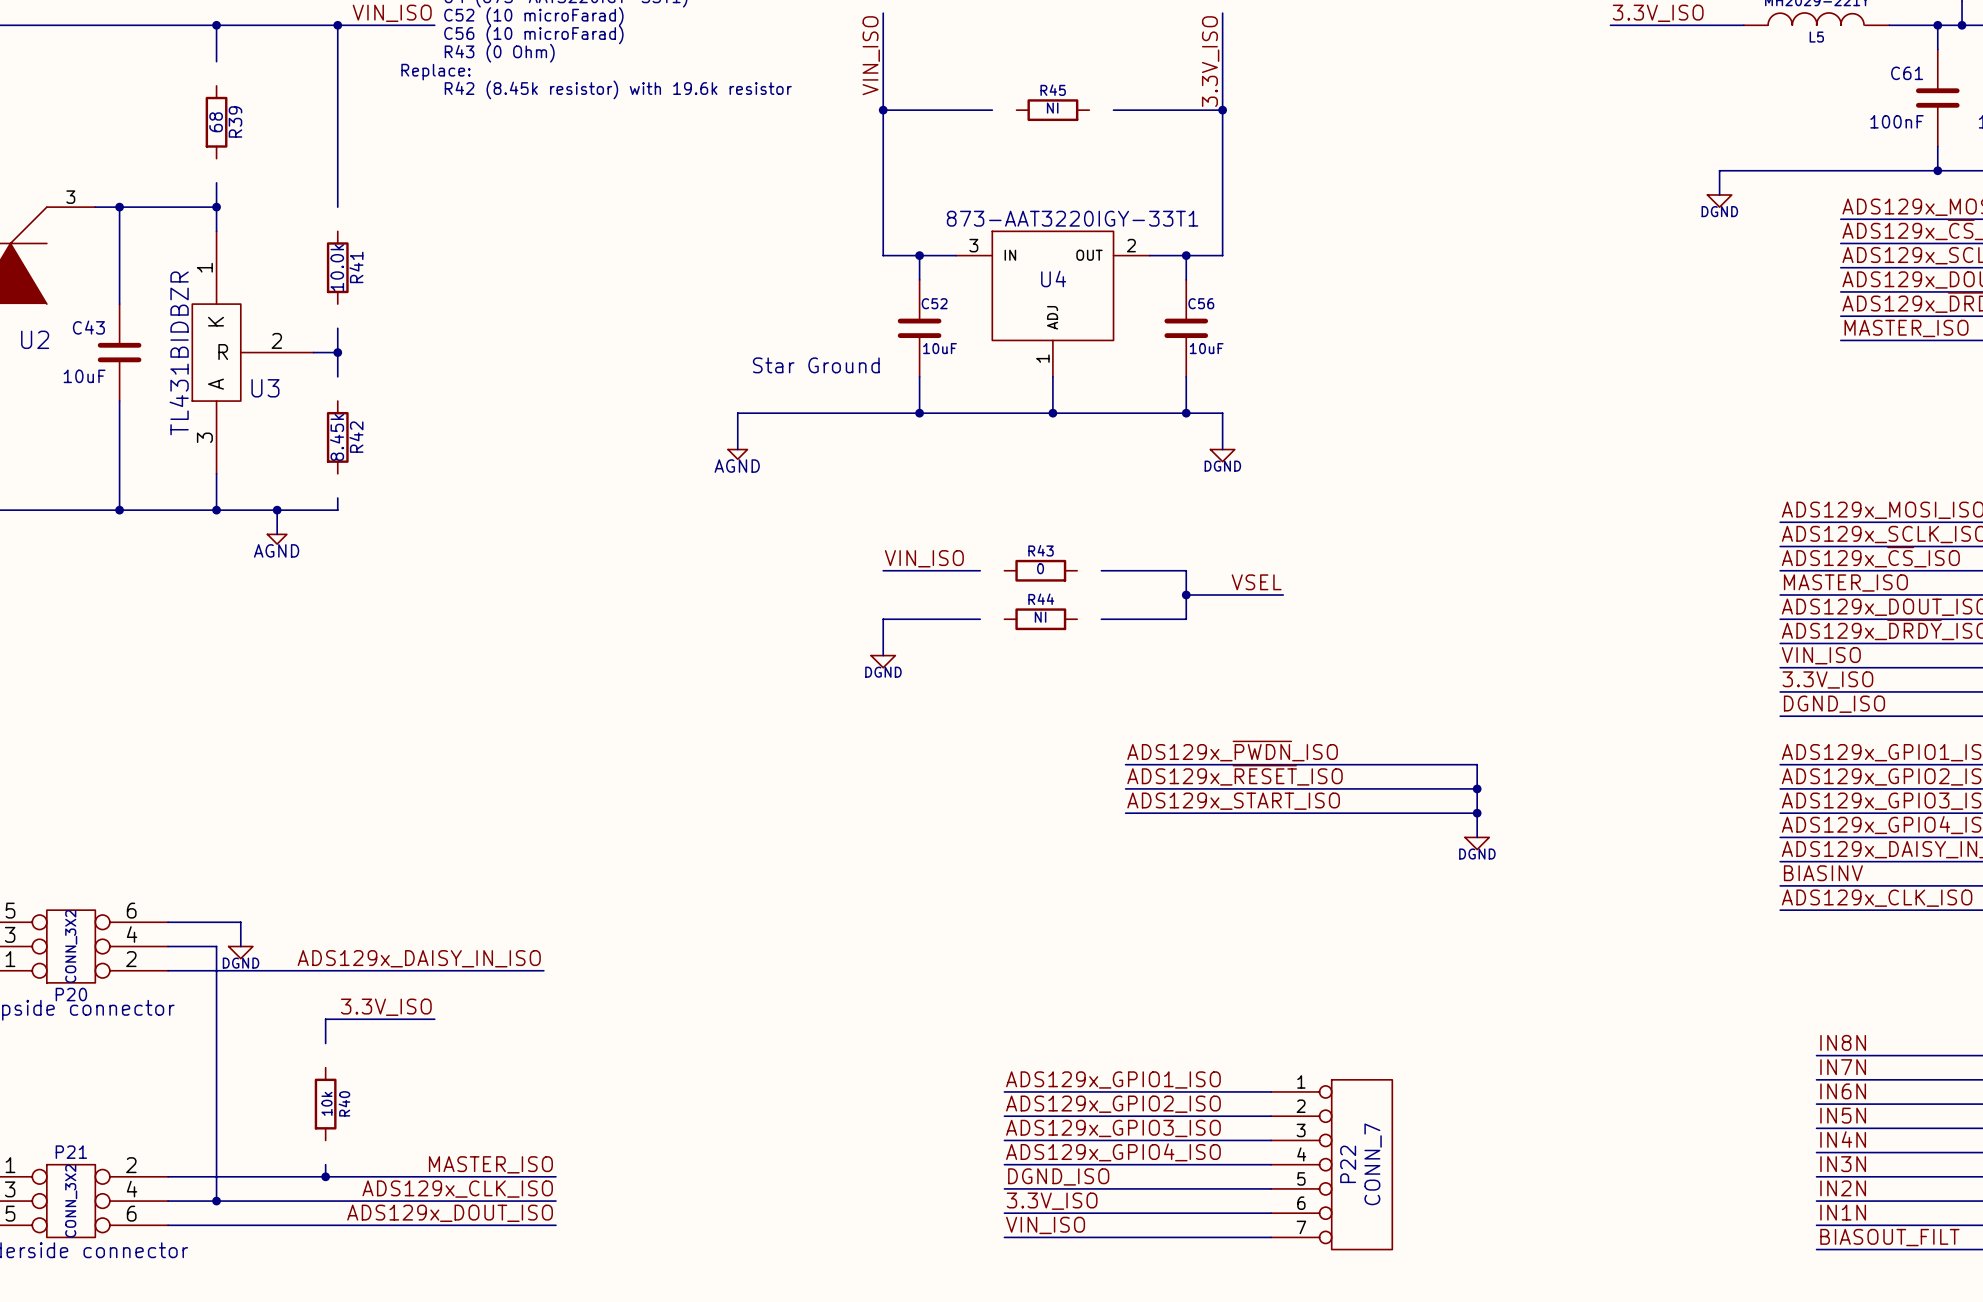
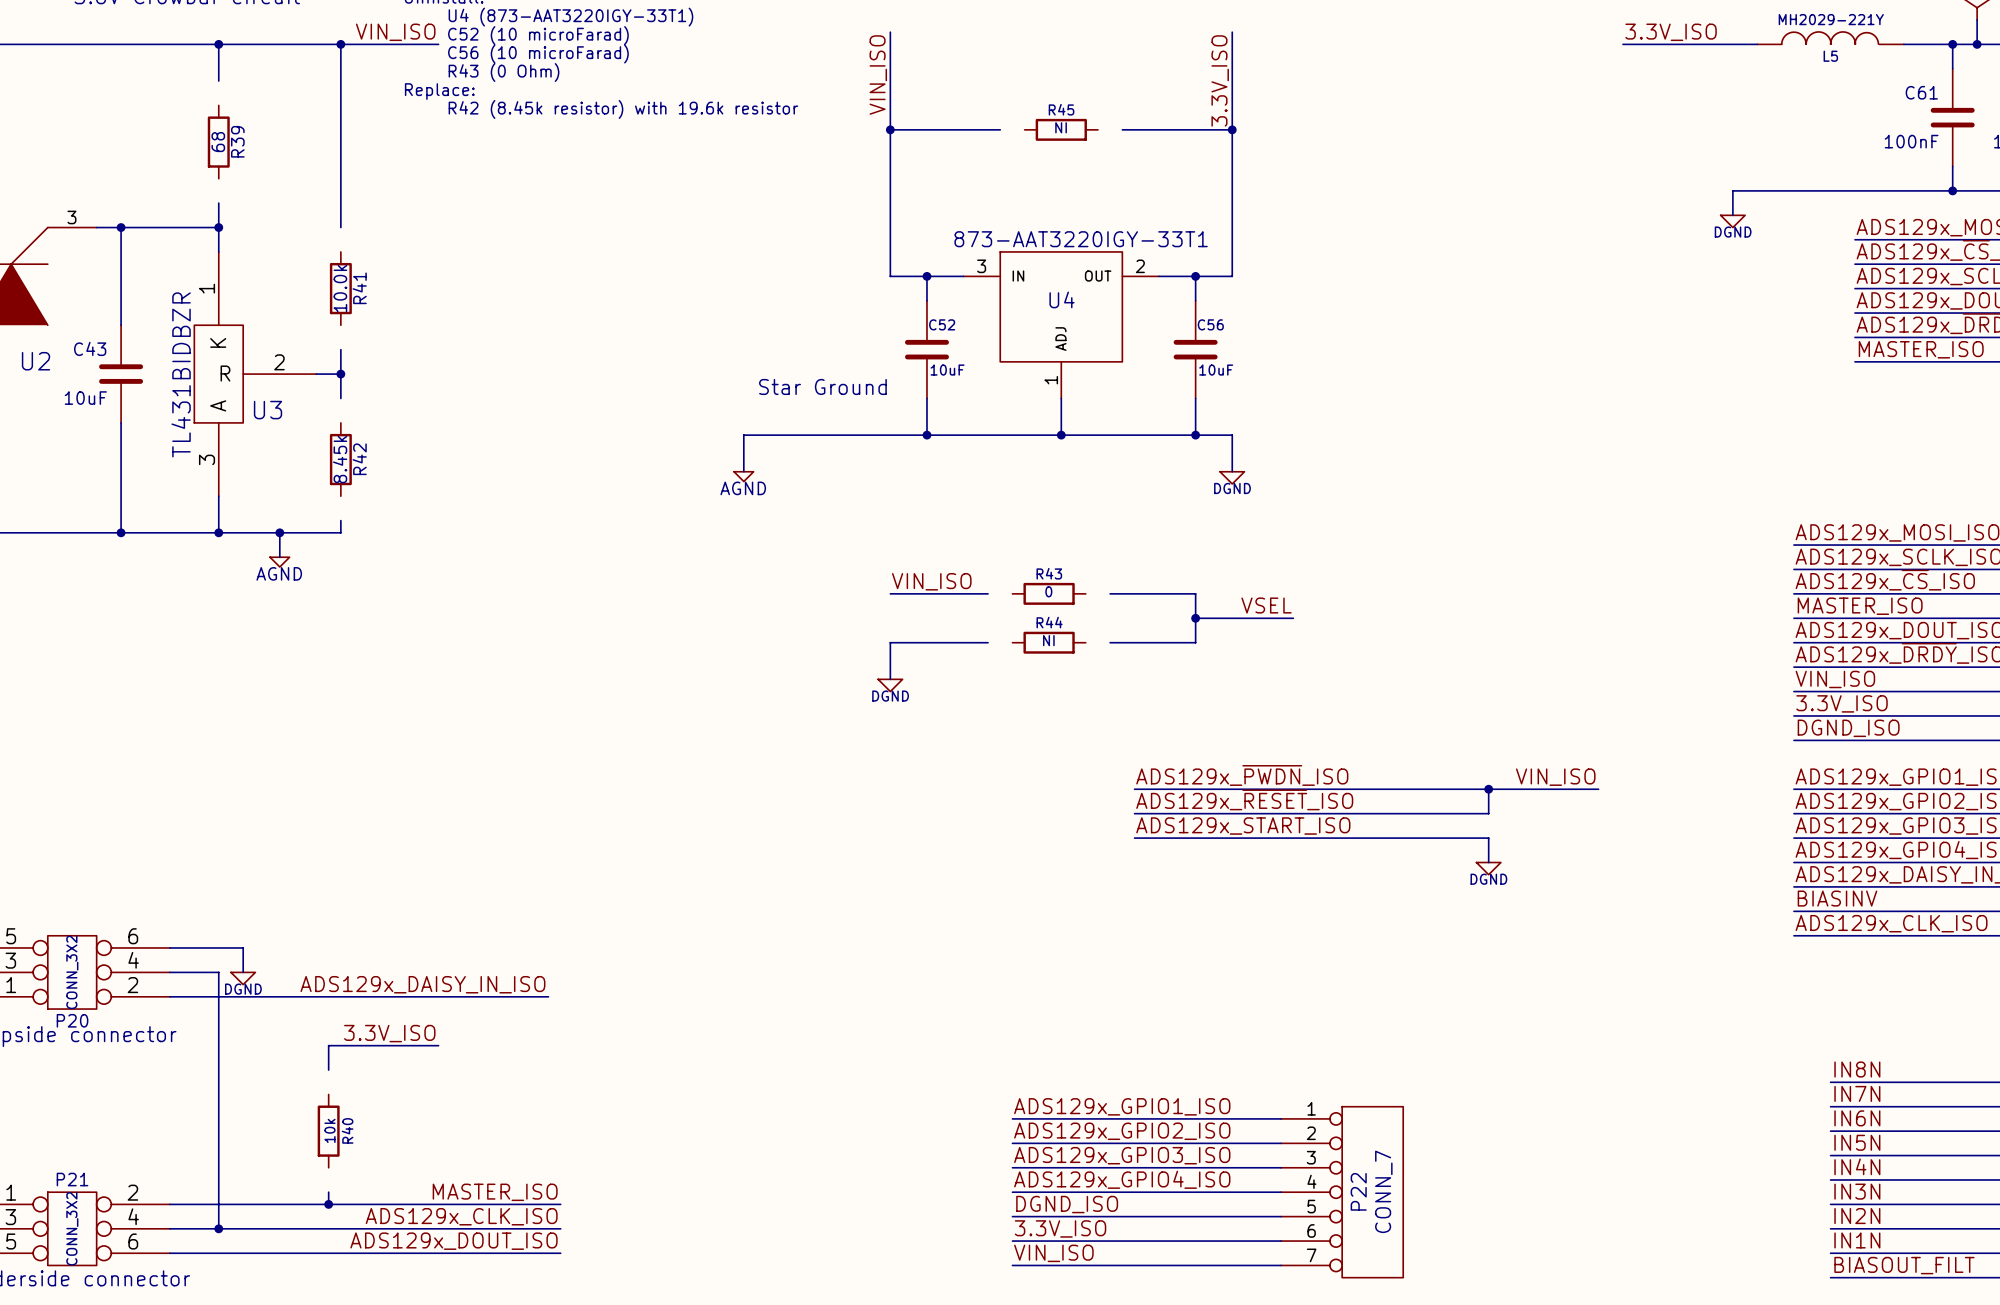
label: none -> VIN_ISO (1555, 777)
wire: none -> (1488, 789) (1598, 789)
junction: none -> (1488, 789)
wire: (1477, 788) (1477, 813) -> none
junction: (1477, 788) -> none
junction: (1477, 813) -> none

